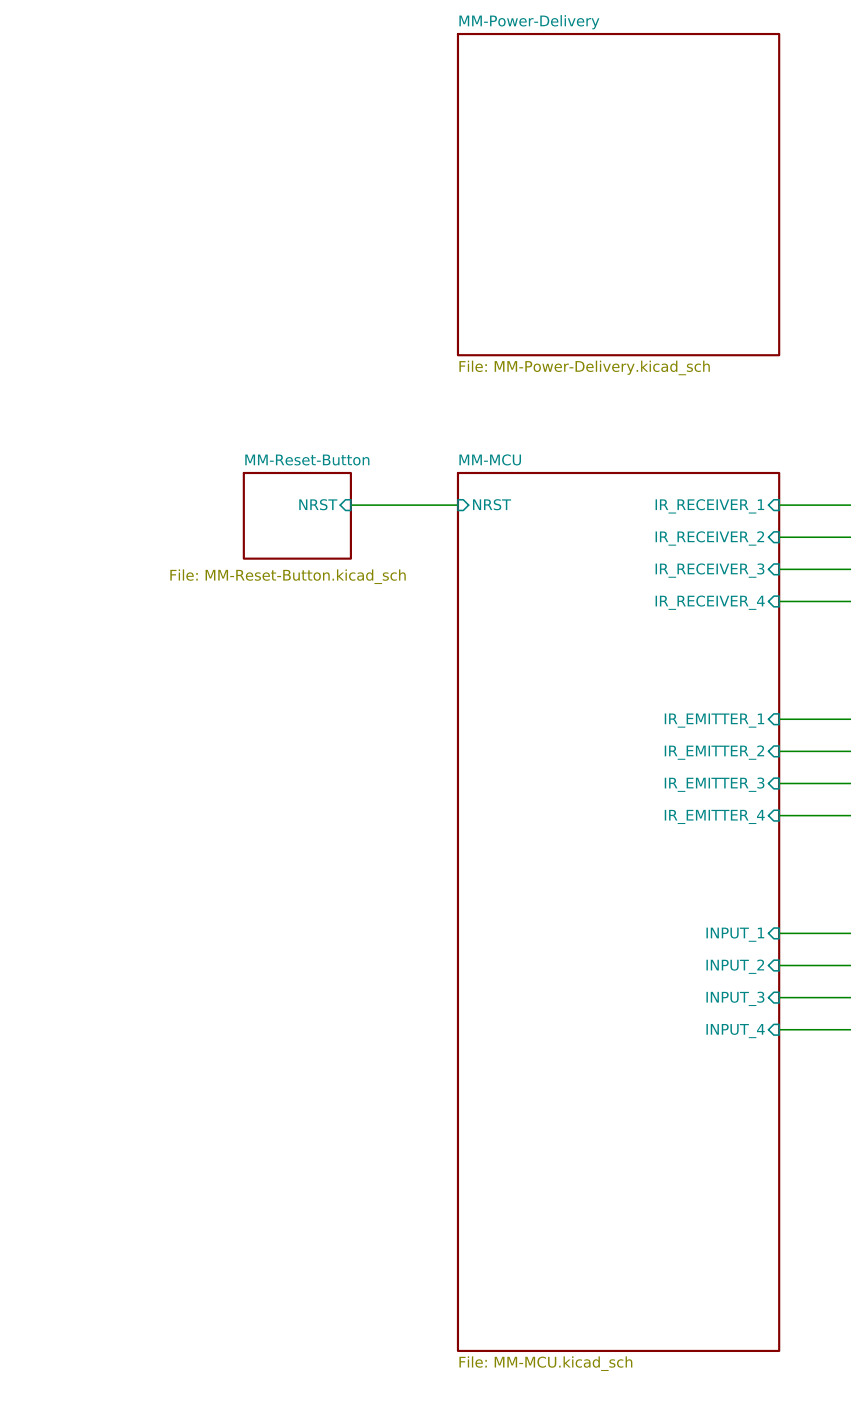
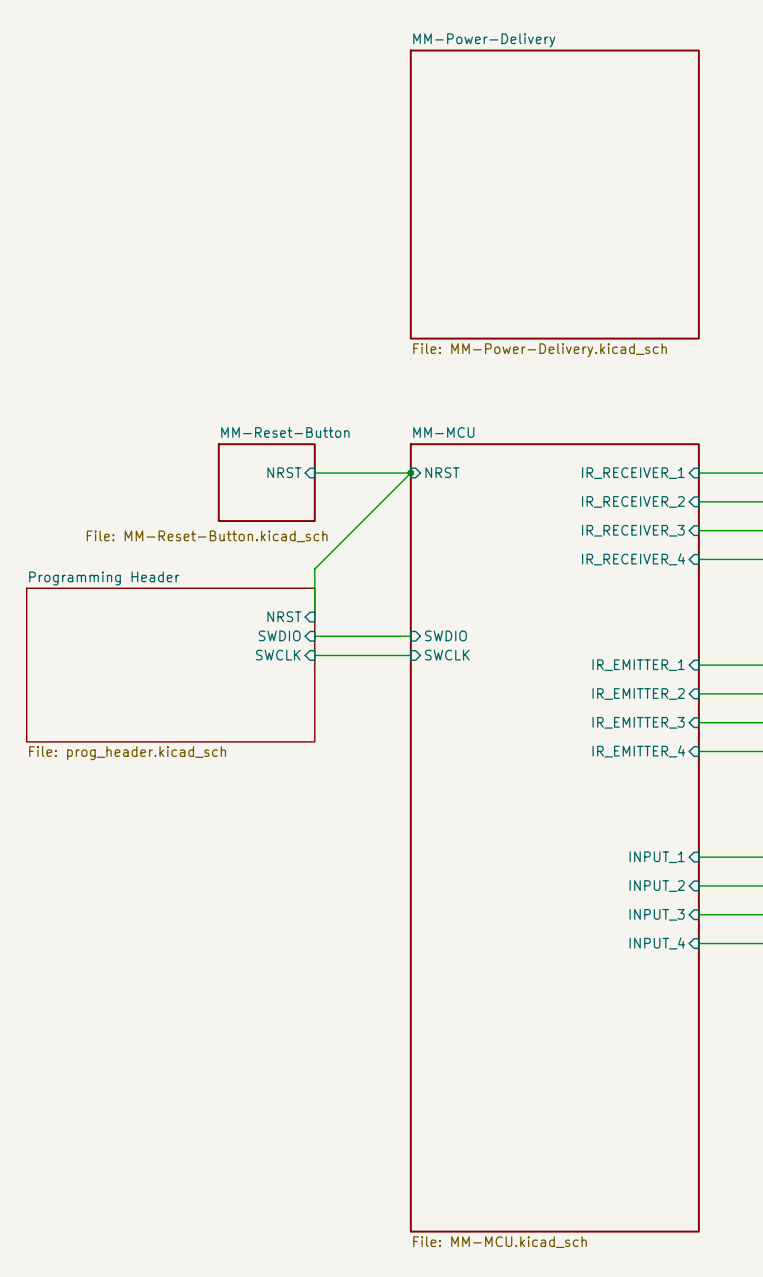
wire: none -> (410, 473) (314, 569) (314, 617)
junction: none -> (410, 473)
sheet MM-Reset-Button value position: File: MM-Reset-Button.kicad_sch (288, 576) -> File: MM-Reset-Button.kicad_sch (207, 536)
sheet pin: none -> NRST (284, 616)
sheet pin: none -> SWDIO (279, 635)
sheet pin: none -> SWDIO (445, 635)
wire: none -> (314, 636) (410, 636)
sheet pin: none -> SWCLK (278, 655)
wire: none -> (314, 655) (410, 655)
sheet pin: none -> SWCLK (447, 655)
sheet Programming Header: none -> File: prog_header.kicad_sch (170, 665)

